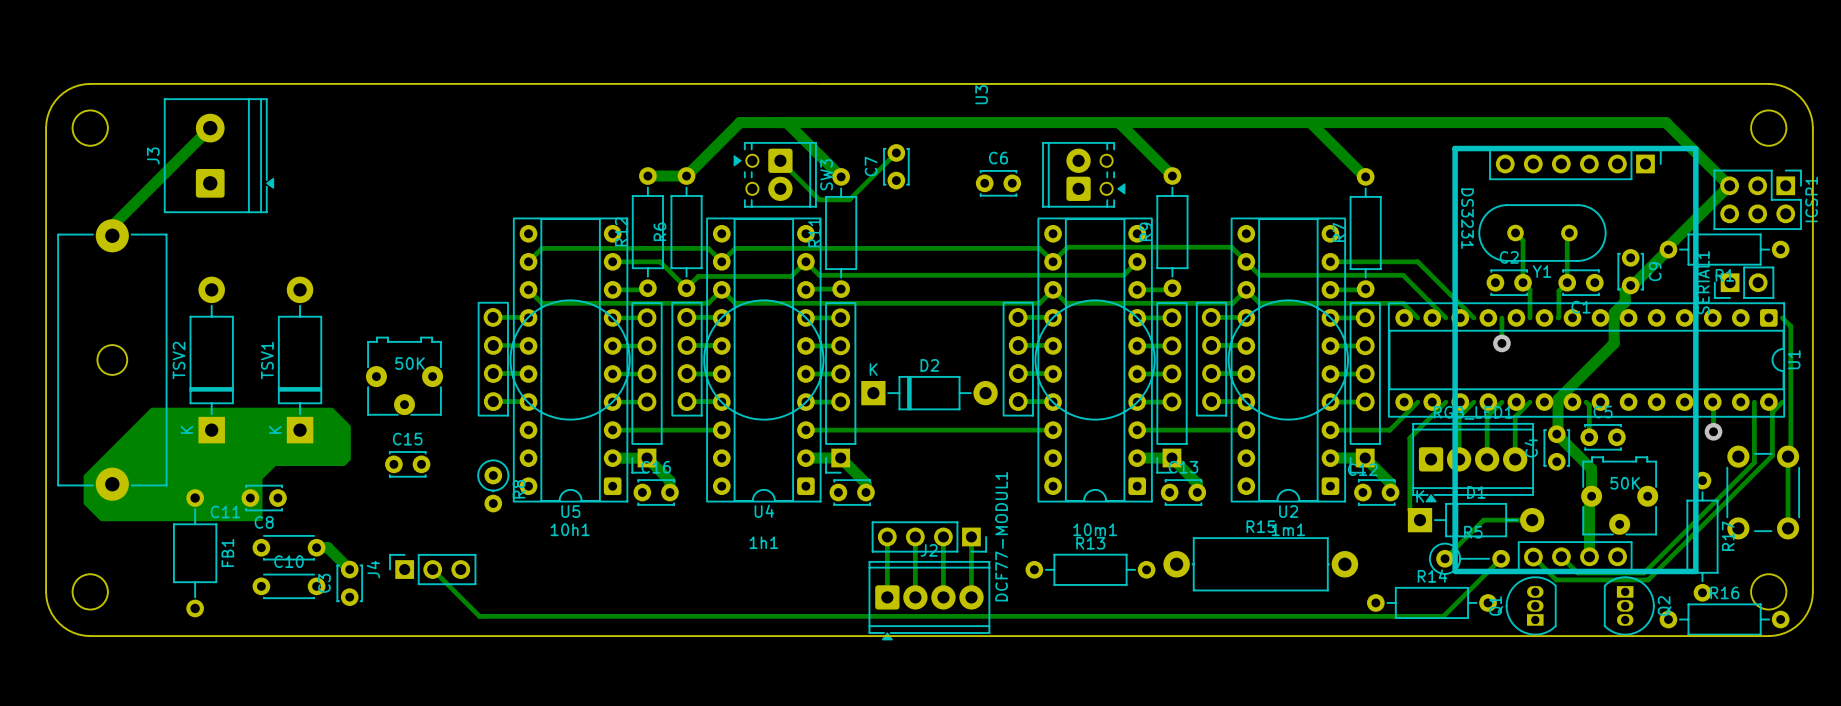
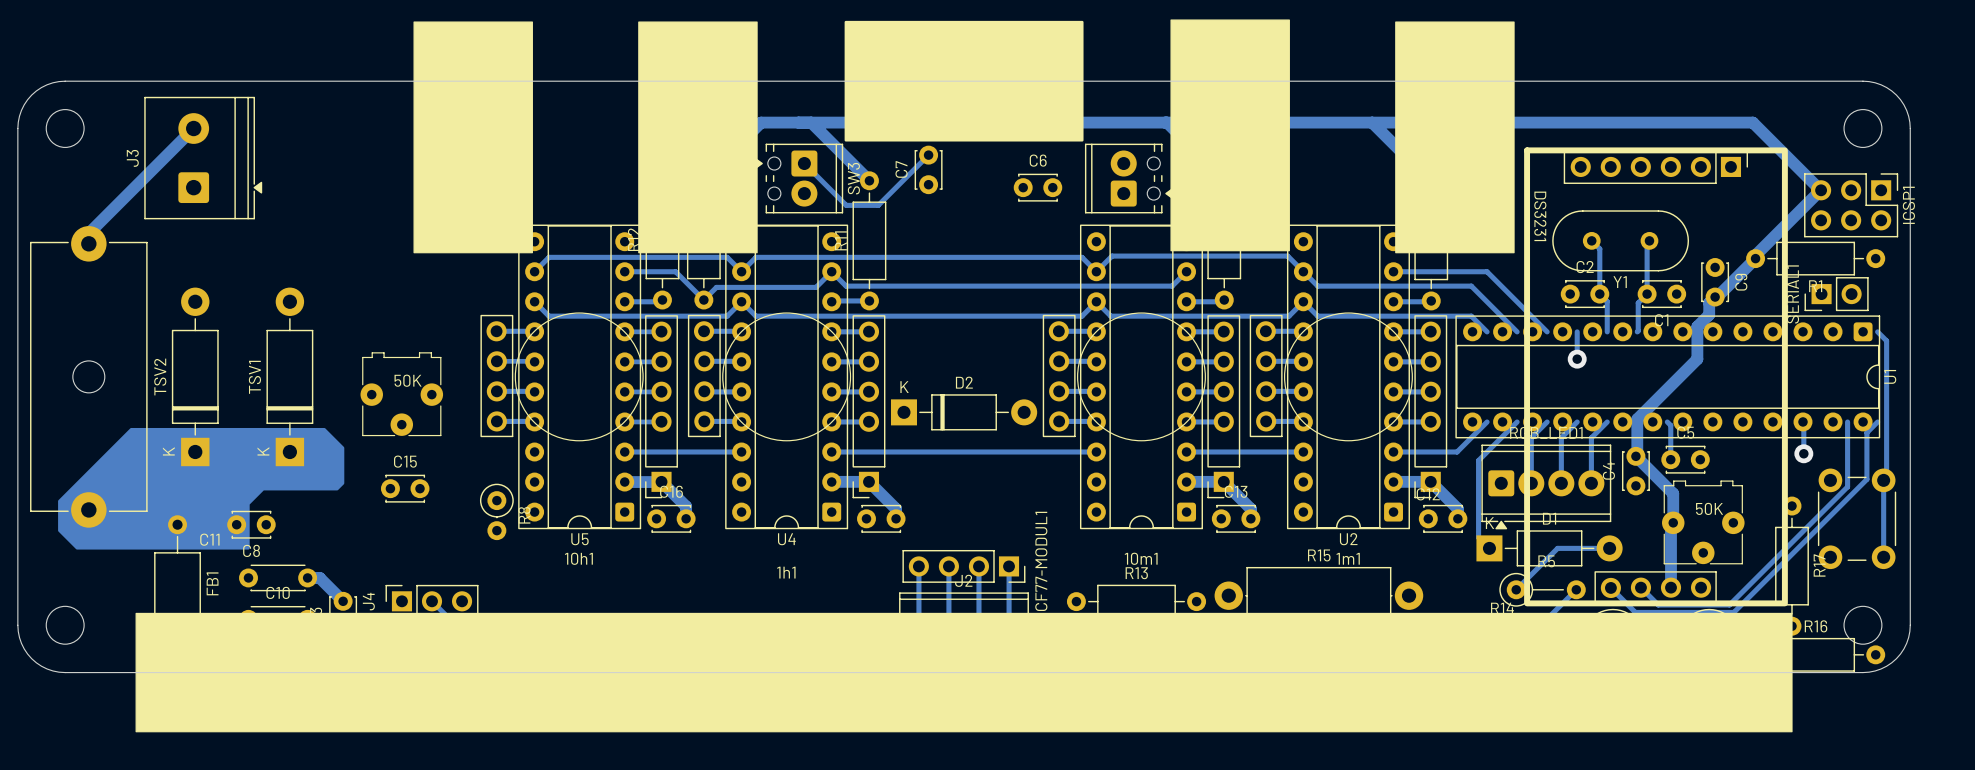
drawing: none -> [1170, 19, 1290, 252]
drawing: none -> [844, 20, 1084, 142]
drawing: none -> [413, 21, 533, 254]
drawing: none -> [638, 21, 758, 254]
drawing: none -> [1395, 21, 1515, 254]
drawing: none -> [135, 612, 1793, 733]

